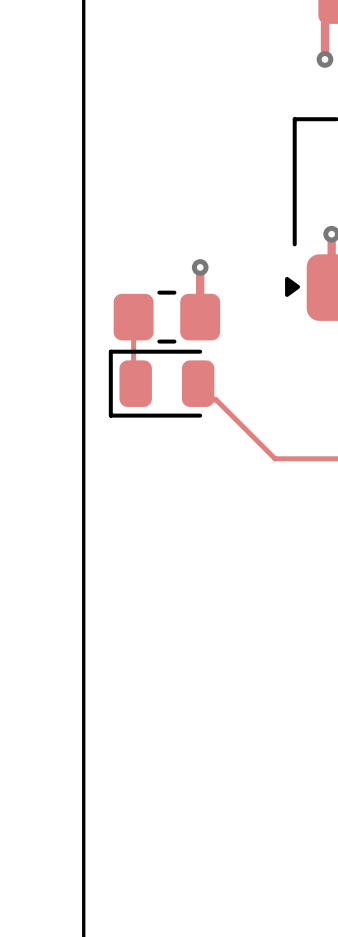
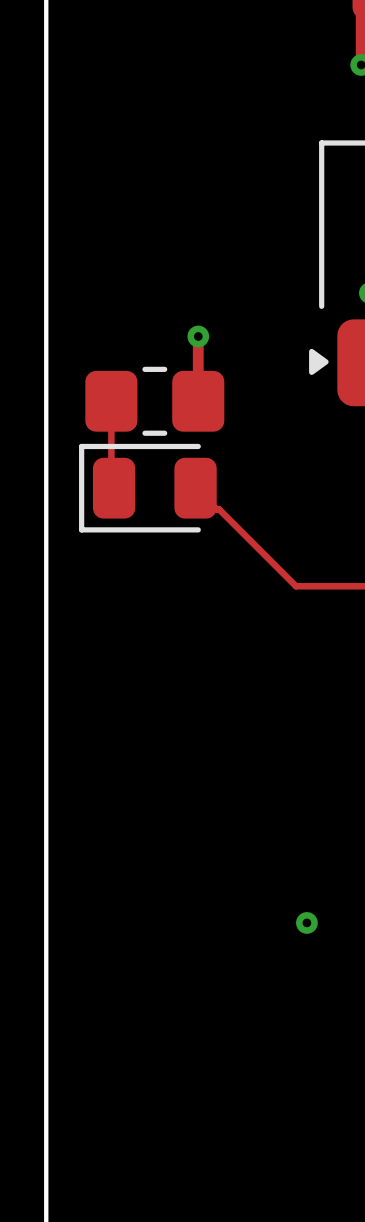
via: none -> (306, 922)

